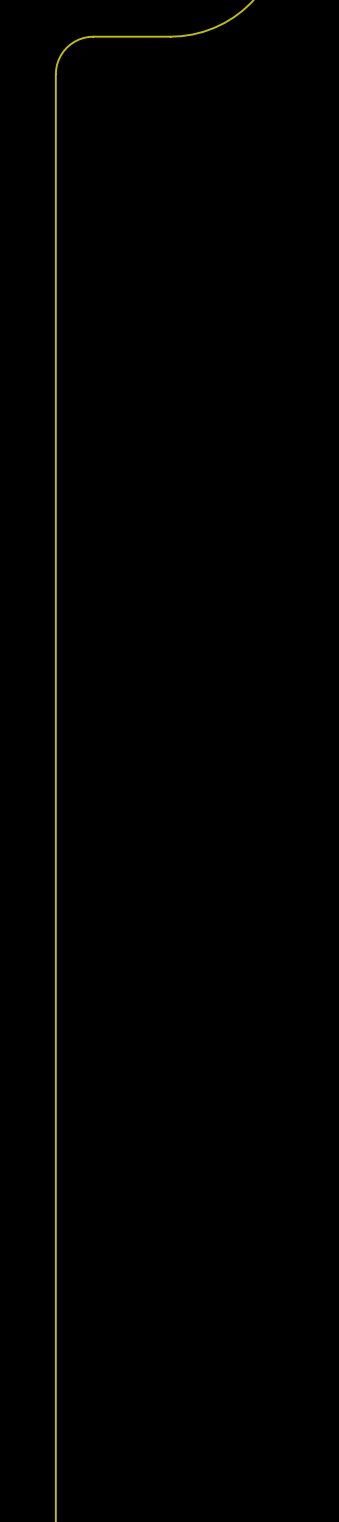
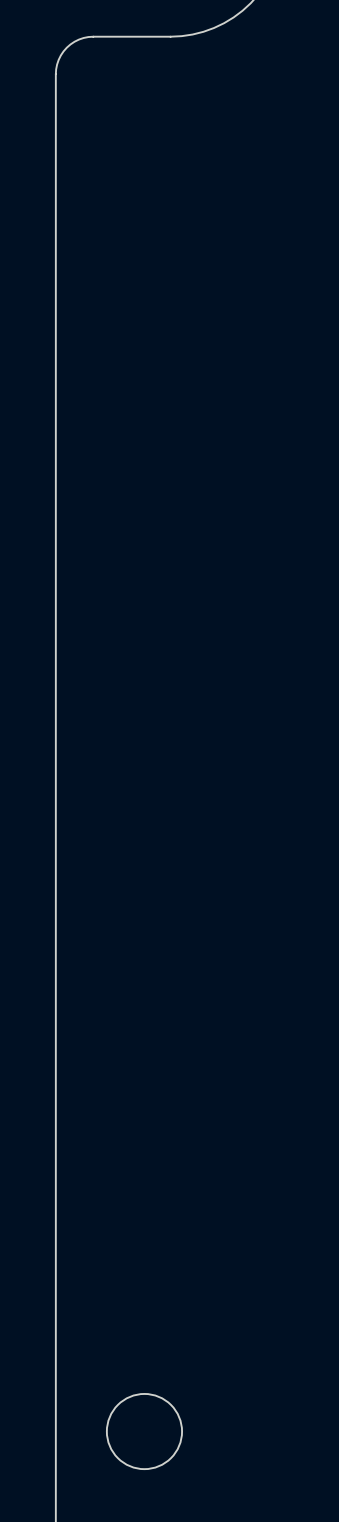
round board edge: none -> [105, 1393, 183, 1471]

